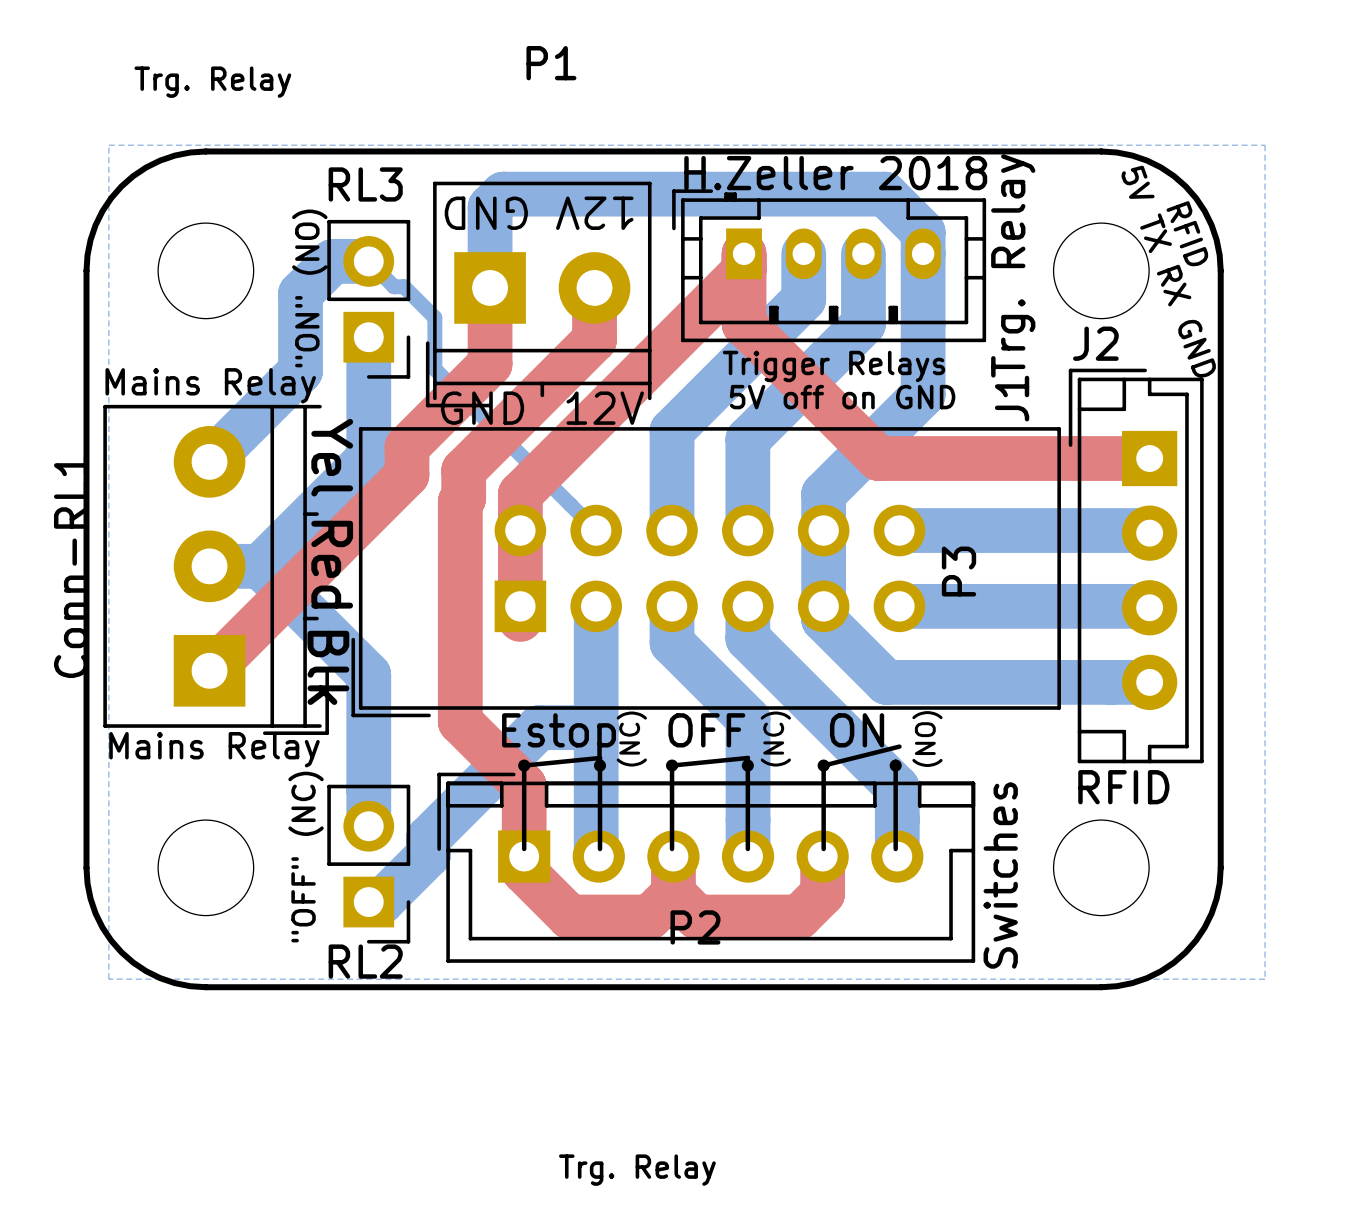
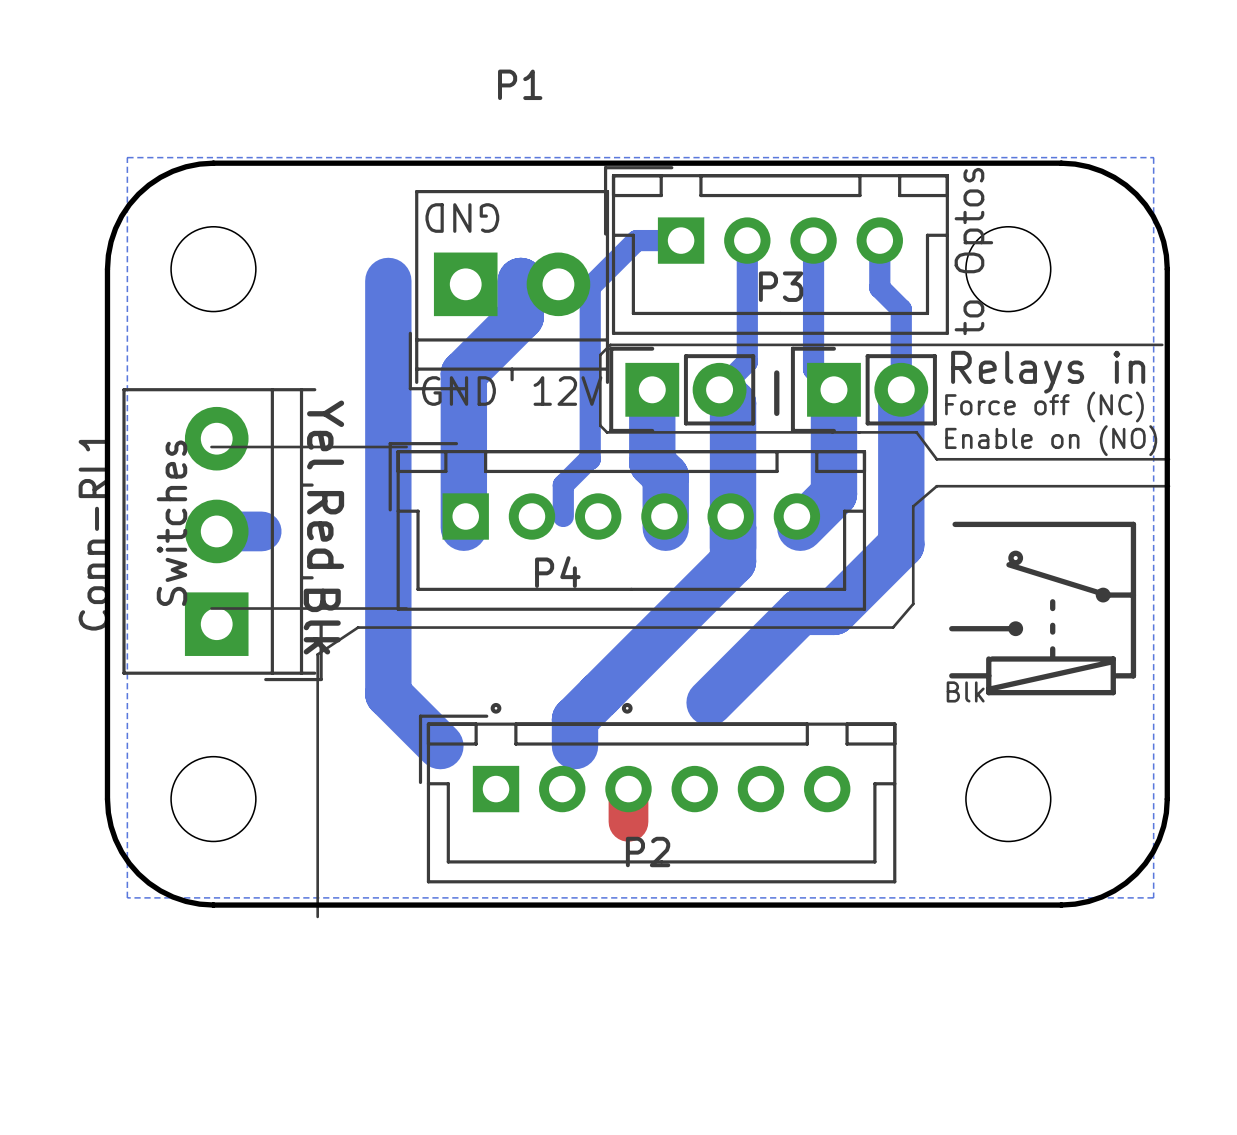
text: Trg. Relay (212, 82) -> none
board edge: (1101, 151) (1132, 155) (1147, 160) (1174, 176) (1185, 186) (1204, 211) (1211, 225) (1216, 239) (1220, 270) (1219, 883) (1211, 913) (1204, 927) (1196, 940) (1174, 962) (1147, 978) (1132, 983) (1101, 987) -> (1008, 163) (1075, 164) (1088, 166) (1114, 177) (1136, 194) (1153, 216) (1163, 241) (1167, 269) (1167, 799) (1163, 826) (1153, 852) (1145, 863) (1125, 883) (1114, 890) (1088, 901) (1075, 904) (1008, 905)
text: H.Zeller 2018 (835, 173) -> none
text: 12V (594, 213) -> none
text: RFID (1187, 233) -> none
bottom track: none -> (681, 240) (636, 240) (590, 287) (590, 459) (563, 485) (563, 516)
bottom track: none -> (747, 240) (747, 362) (719, 389) (733, 403) (733, 561) (574, 719) (574, 746)
bottom track: none -> (813, 240) (813, 369) (833, 389) (833, 494) (800, 527)
bottom track: none -> (879, 240) (879, 287) (901, 309) (901, 544) (833, 611) (800, 611) (709, 702)
text: none -> to Optos (973, 251)
top track: (744, 253) (744, 323) (878, 458) (1149, 458) -> none
bottom track: (803, 253) (803, 299) (672, 430) (672, 530) -> none
bottom track: (863, 253) (863, 323) (747, 439) (747, 530) -> none
J1: (829, 265) -> none
text: Trg. Relay (1013, 265) -> none
top track: (744, 270) (520, 494) (520, 619) -> none
text: 5V TX RX GND (1168, 271) -> none
bottom track: none -> (388, 280) (388, 694) (440, 746)
bottom track: none -> (520, 280) (520, 316) (463, 373) (463, 527)
bottom track: (490, 287) (490, 207) (503, 194) (885, 194) (923, 232) (923, 394) (823, 494) (823, 619) (886, 682) (1149, 682) -> none
top track: (490, 287) (490, 364) (406, 447) (406, 474) (209, 670) -> none
top track: (594, 287) (594, 339) (463, 470) (463, 498) (460, 501) (460, 721) (524, 785) (524, 871) (569, 916) (649, 916) (673, 893) (696, 916) (799, 916) (822, 893) (822, 856) -> none
text: "ON" (NO) (309, 288) -> none
RL3: (368, 299) -> none
bottom track: (368, 337) (368, 457) (260, 566) (368, 674) (368, 826) -> none
line: none -> (1162, 344) (610, 344) (600, 354) (600, 425) (607, 432) (916, 432) (936, 459) (1168, 459)
text: Trigger Relays (834, 366) -> none
text: Mains Relay (210, 385) -> none
text: none -> Relays in (1048, 372)
line: none -> (776, 372) (776, 413)
text: 5V off on GND (842, 397) -> none
bottom track: none -> (652, 389) (652, 463) (665, 476) (665, 527)
part: none -> Force off (NC) (682, 389)
part: none -> Enable on (NO) (863, 389)
P3 footprint: [351, 427, 1061, 718] -> [603, 166, 949, 335]
bottom track: (209, 461) (300, 370) (300, 293) (332, 261) (368, 261) (394, 286) (403, 286) (434, 317) (434, 369) (596, 530) -> none
line: none -> (211, 447) (406, 447)
line: none -> (1168, 486) (936, 486) (913, 506) (913, 603) (893, 627) (358, 627) (317, 654) (317, 916)
bottom track: (899, 530) (1147, 530) (1149, 533) -> none
line: none -> (955, 524) (1133, 524) (1133, 675) (1116, 675)
P4: none -> Switches (627, 526)
J2: (1136, 565) -> none
P3 name position: P3 (959, 571) -> P3 (781, 286)
drawing: none -> [1008, 550, 1024, 566]
line: none -> (1008, 564) (1106, 595)
bottom track: (596, 606) (596, 853) (598, 856) -> none
bottom track: (672, 606) (672, 642) (748, 718) (748, 856) -> none
bottom track: (747, 606) (747, 638) (897, 787) (897, 856) -> none
bottom track: (899, 606) (1149, 607) -> none
drawing: none -> [1095, 587, 1111, 603]
line: none -> (1103, 595) (1133, 595)
line: none -> (1052, 601) (1052, 608)
line: none -> (211, 608) (406, 608)
drawing: none -> [1008, 621, 1024, 637]
line: none -> (1052, 625) (1052, 632)
line: none -> (951, 628) (1015, 628)
line: none -> (1052, 648) (1052, 655)
line: none -> (988, 658) (988, 692) (1113, 692) (1113, 658) (992, 658)
line: none -> (1109, 662) (988, 689)
bottom track: (596, 727) (539, 727) (428, 838) (428, 854) (381, 902) (368, 902) -> none
line: none -> (951, 675) (988, 675)
text: OFF (706, 730) -> none
text: ON (857, 730) -> none
text: Estop (559, 735) -> none
text: (NC) (631, 739) -> none
text: (NC) (775, 739) -> none
text: (NO) (927, 739) -> none
line: (899, 746) (823, 765) (823, 848) -> none
text: none -> Blk (965, 691)
text: Mains Relay (214, 749) -> none
drawing: [593, 759, 607, 772] -> none
drawing: [741, 759, 754, 772] -> none
drawing: [817, 759, 830, 772] -> none
drawing: [889, 759, 902, 772] -> none
line: (895, 761) (895, 848) -> none
text: RFID (1123, 787) -> none
line: (524, 848) (524, 765) (600, 757) (600, 848) -> none
line: (672, 848) (672, 765) (747, 757) (747, 848) -> none
text: "OFF" (NC) (306, 857) -> none
RL2: (368, 864) -> none
text: Switches (1000, 875) -> none
text: Trg. Relay (637, 1170) -> none

